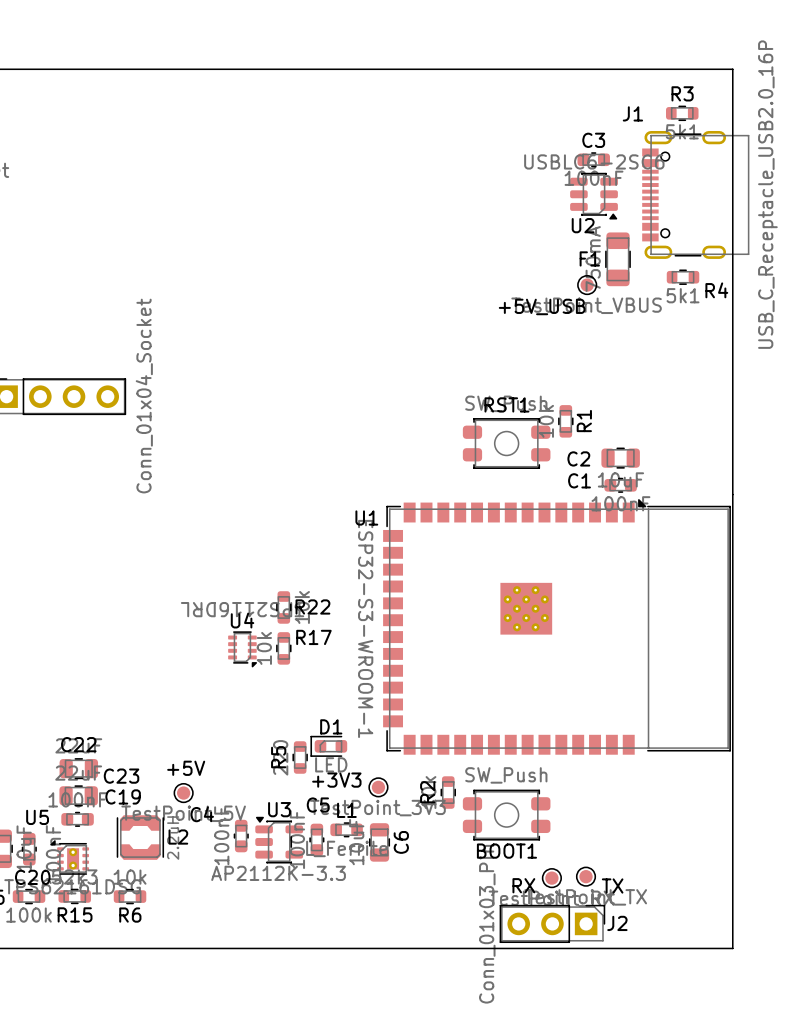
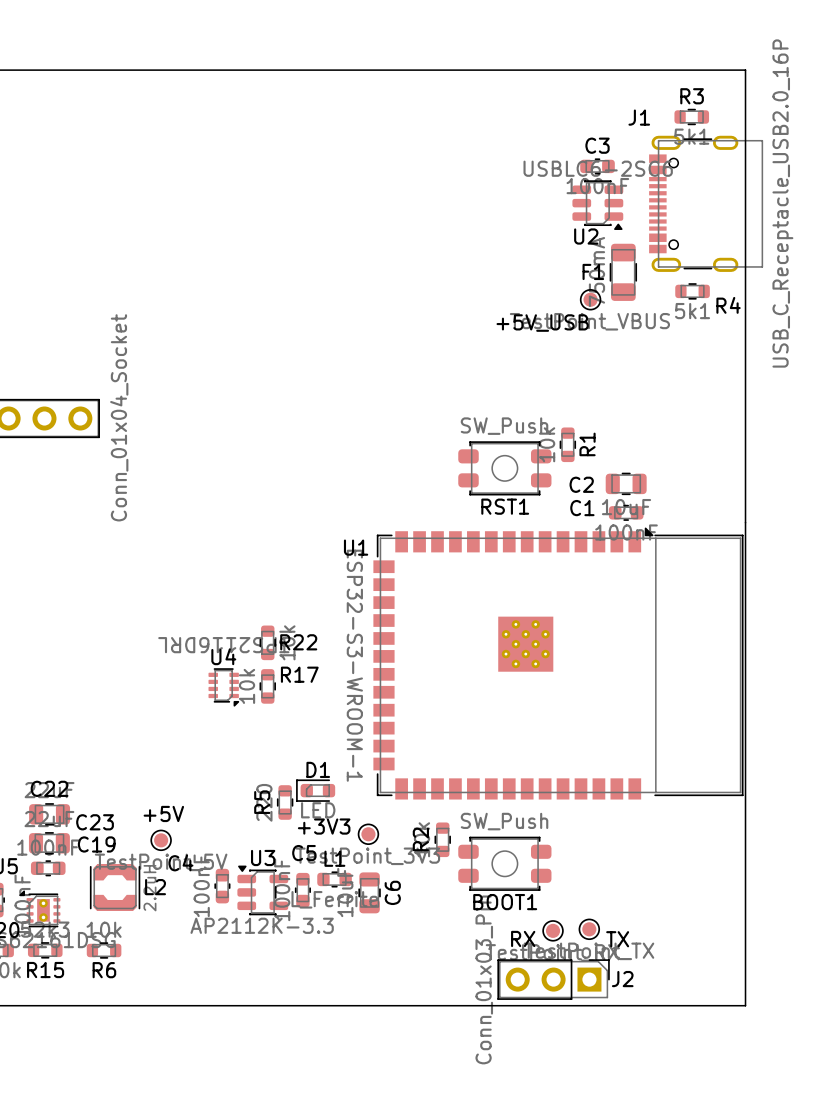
RST1 name position: RST1 (506, 404) -> RST1 (505, 506)

